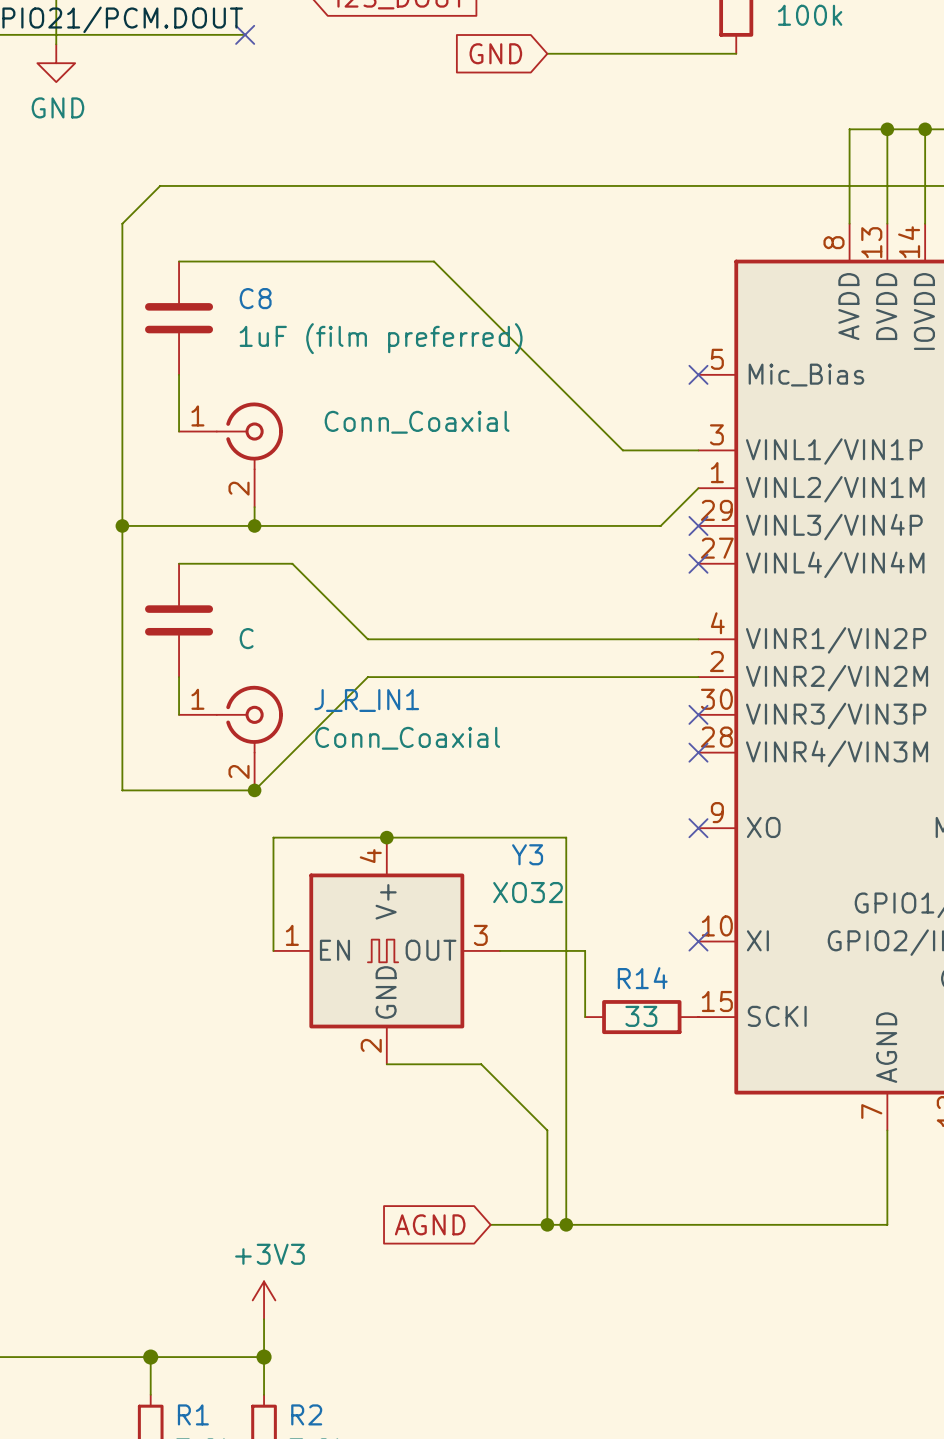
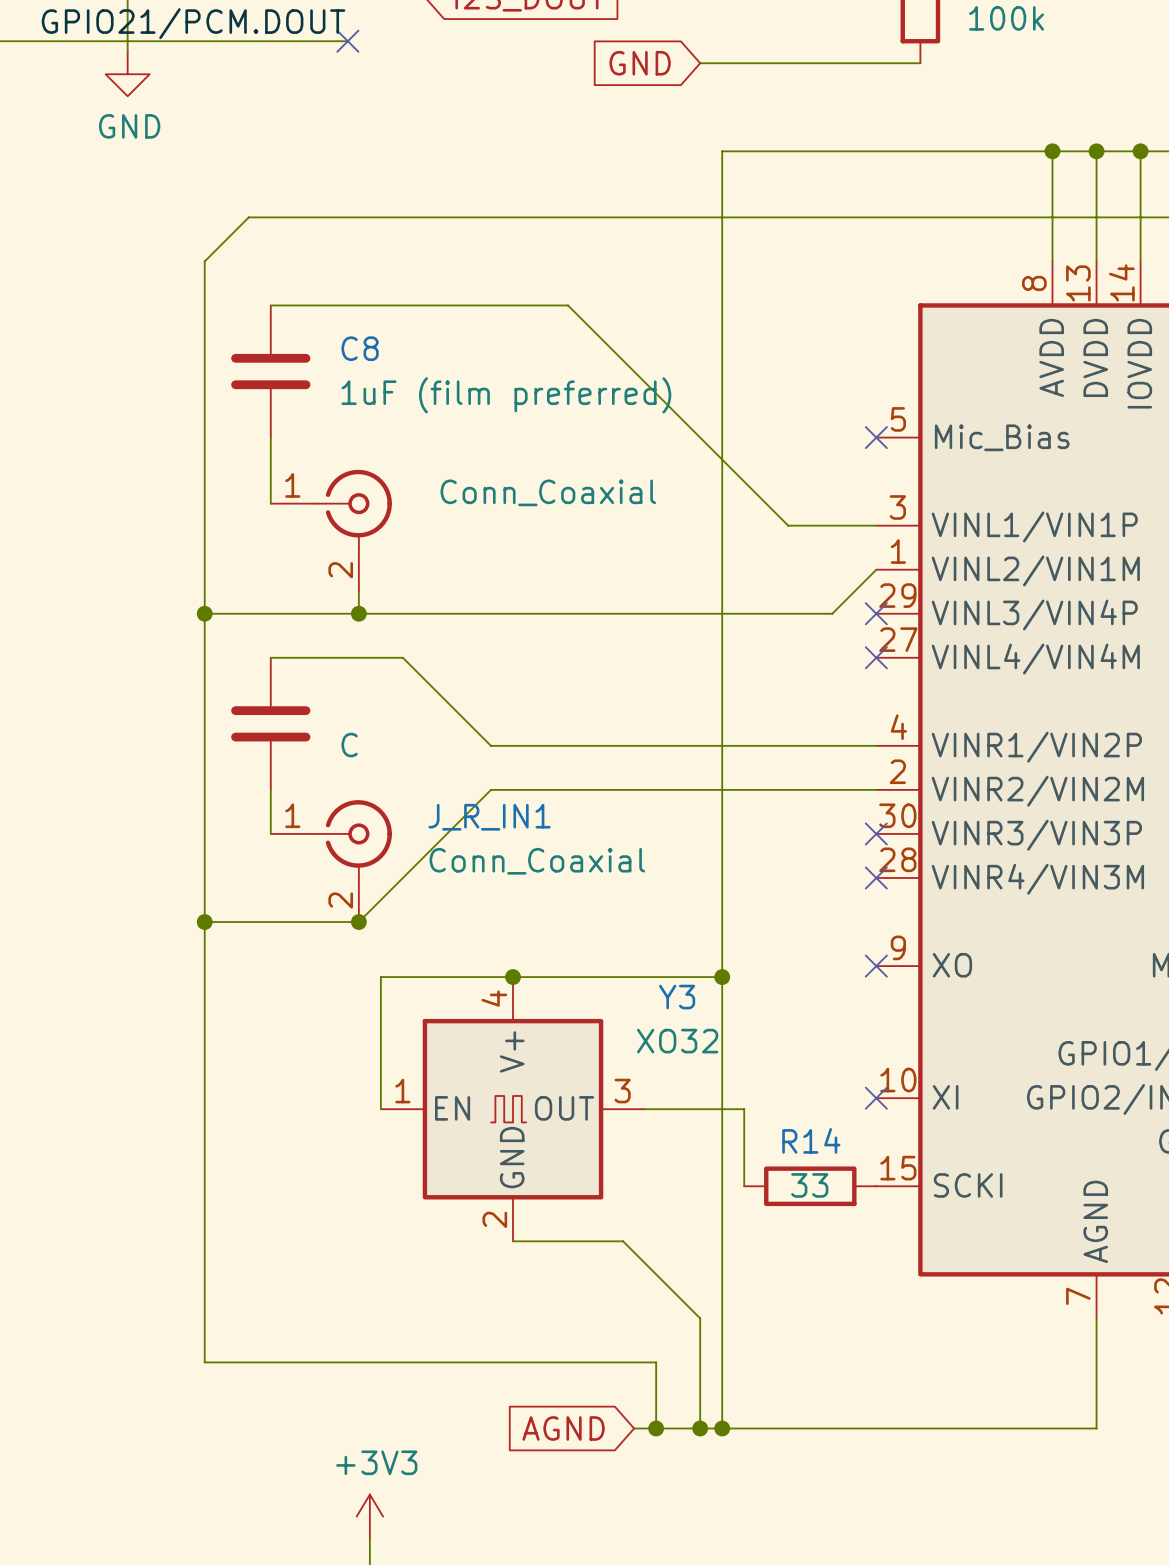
wire: none -> (1052, 151) (722, 151) (722, 977)
junction: none -> (1052, 151)
wire: none -> (204, 922) (204, 1362) (656, 1362) (656, 1428)
junction: none -> (204, 922)
junction: none -> (722, 977)
junction: none -> (656, 1428)

